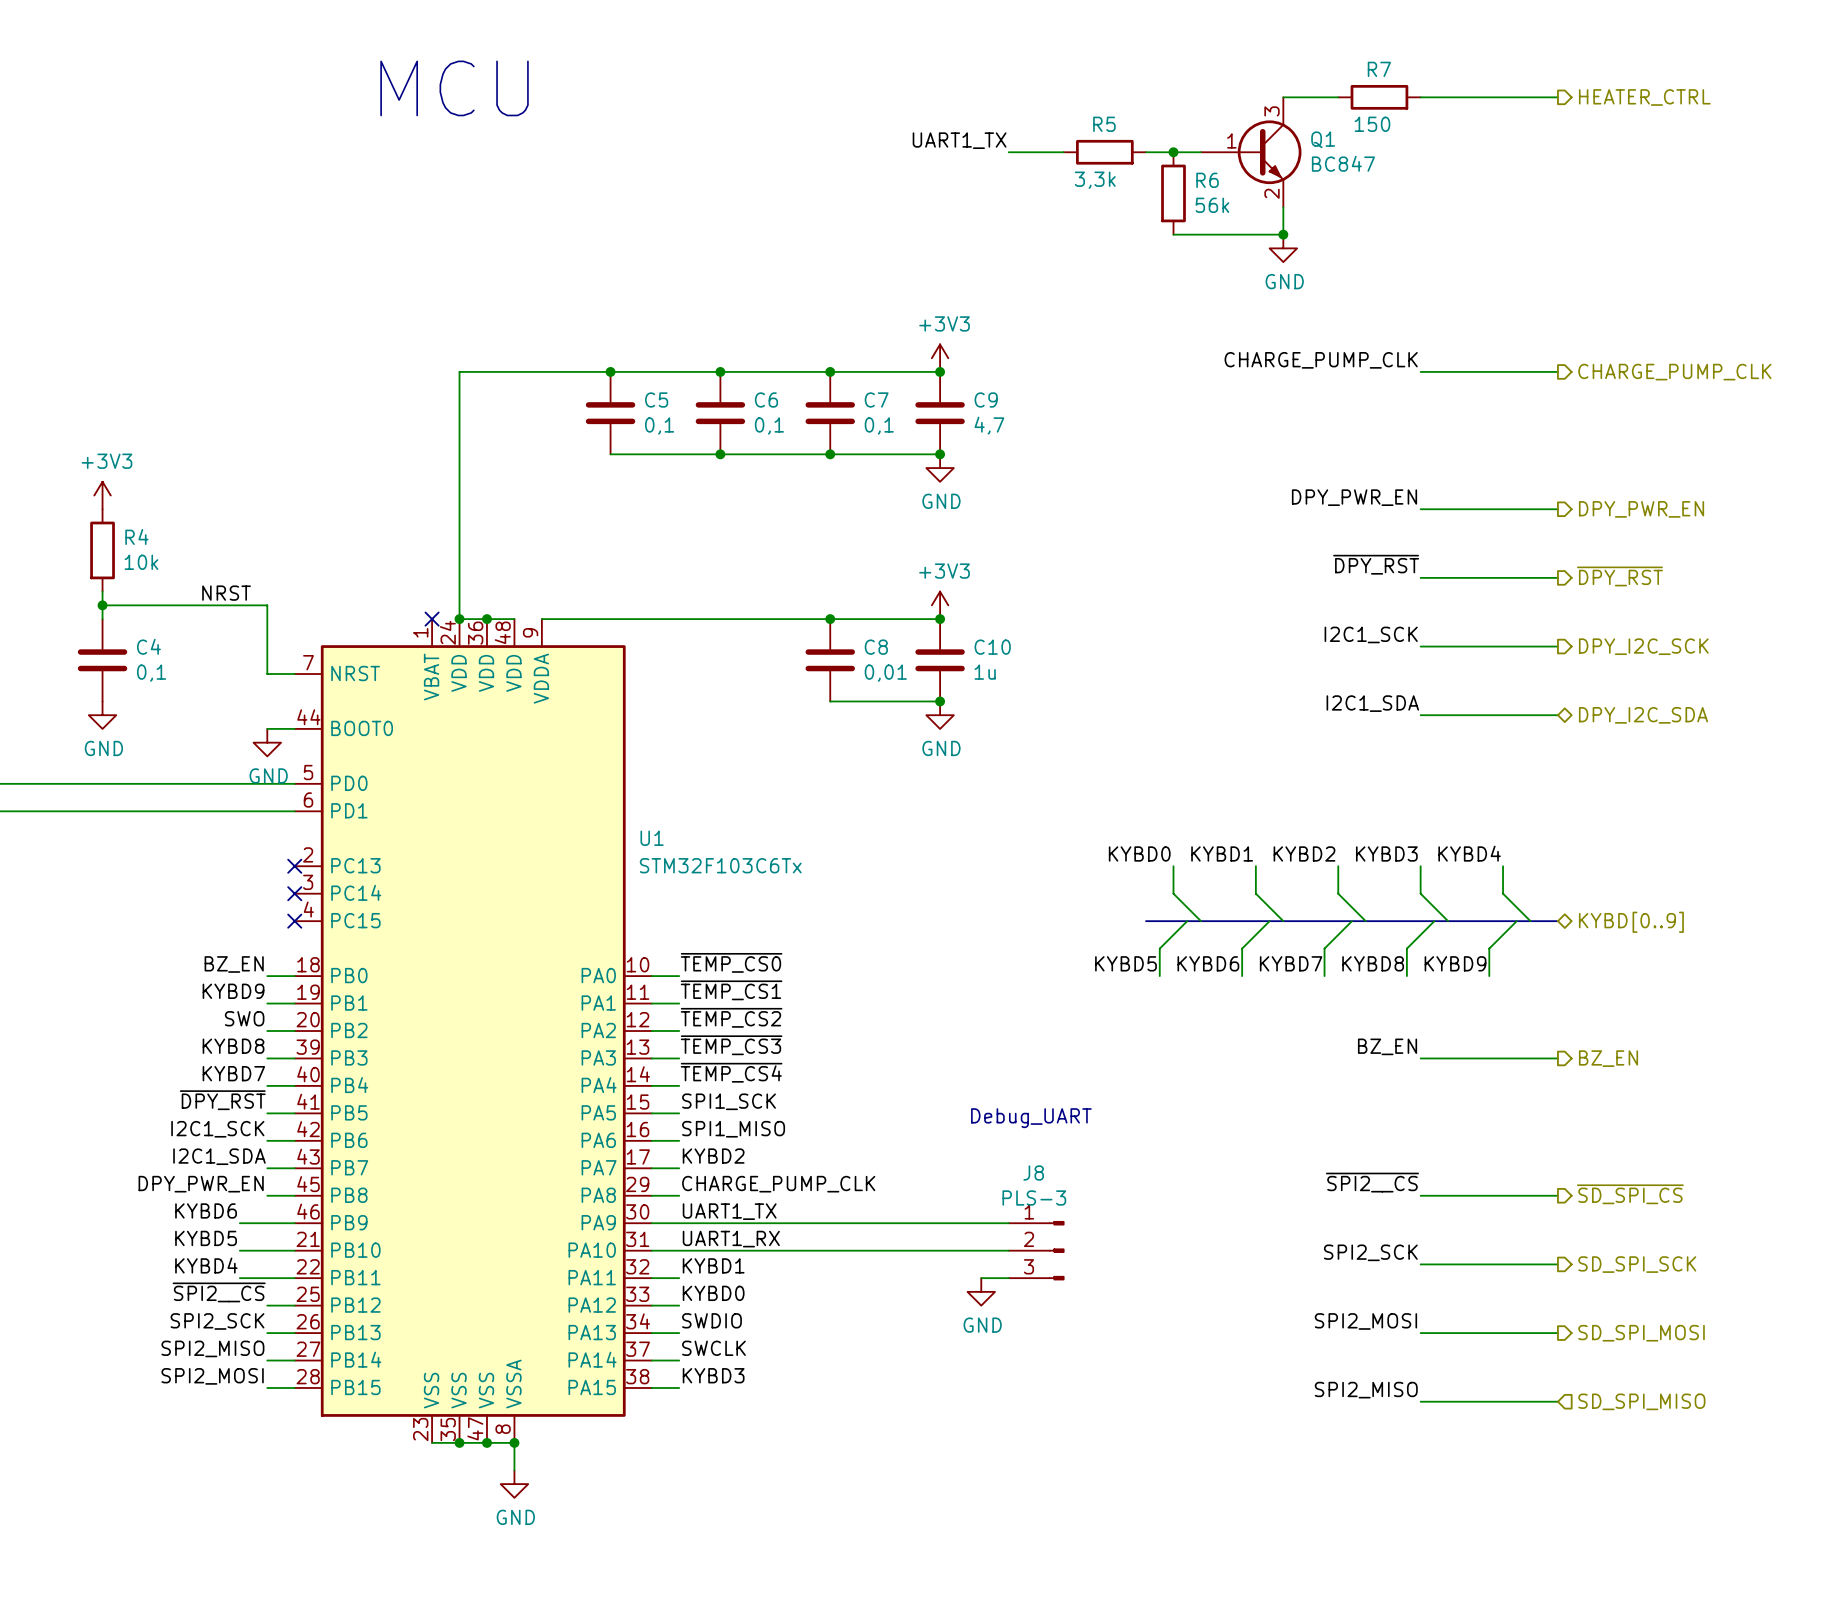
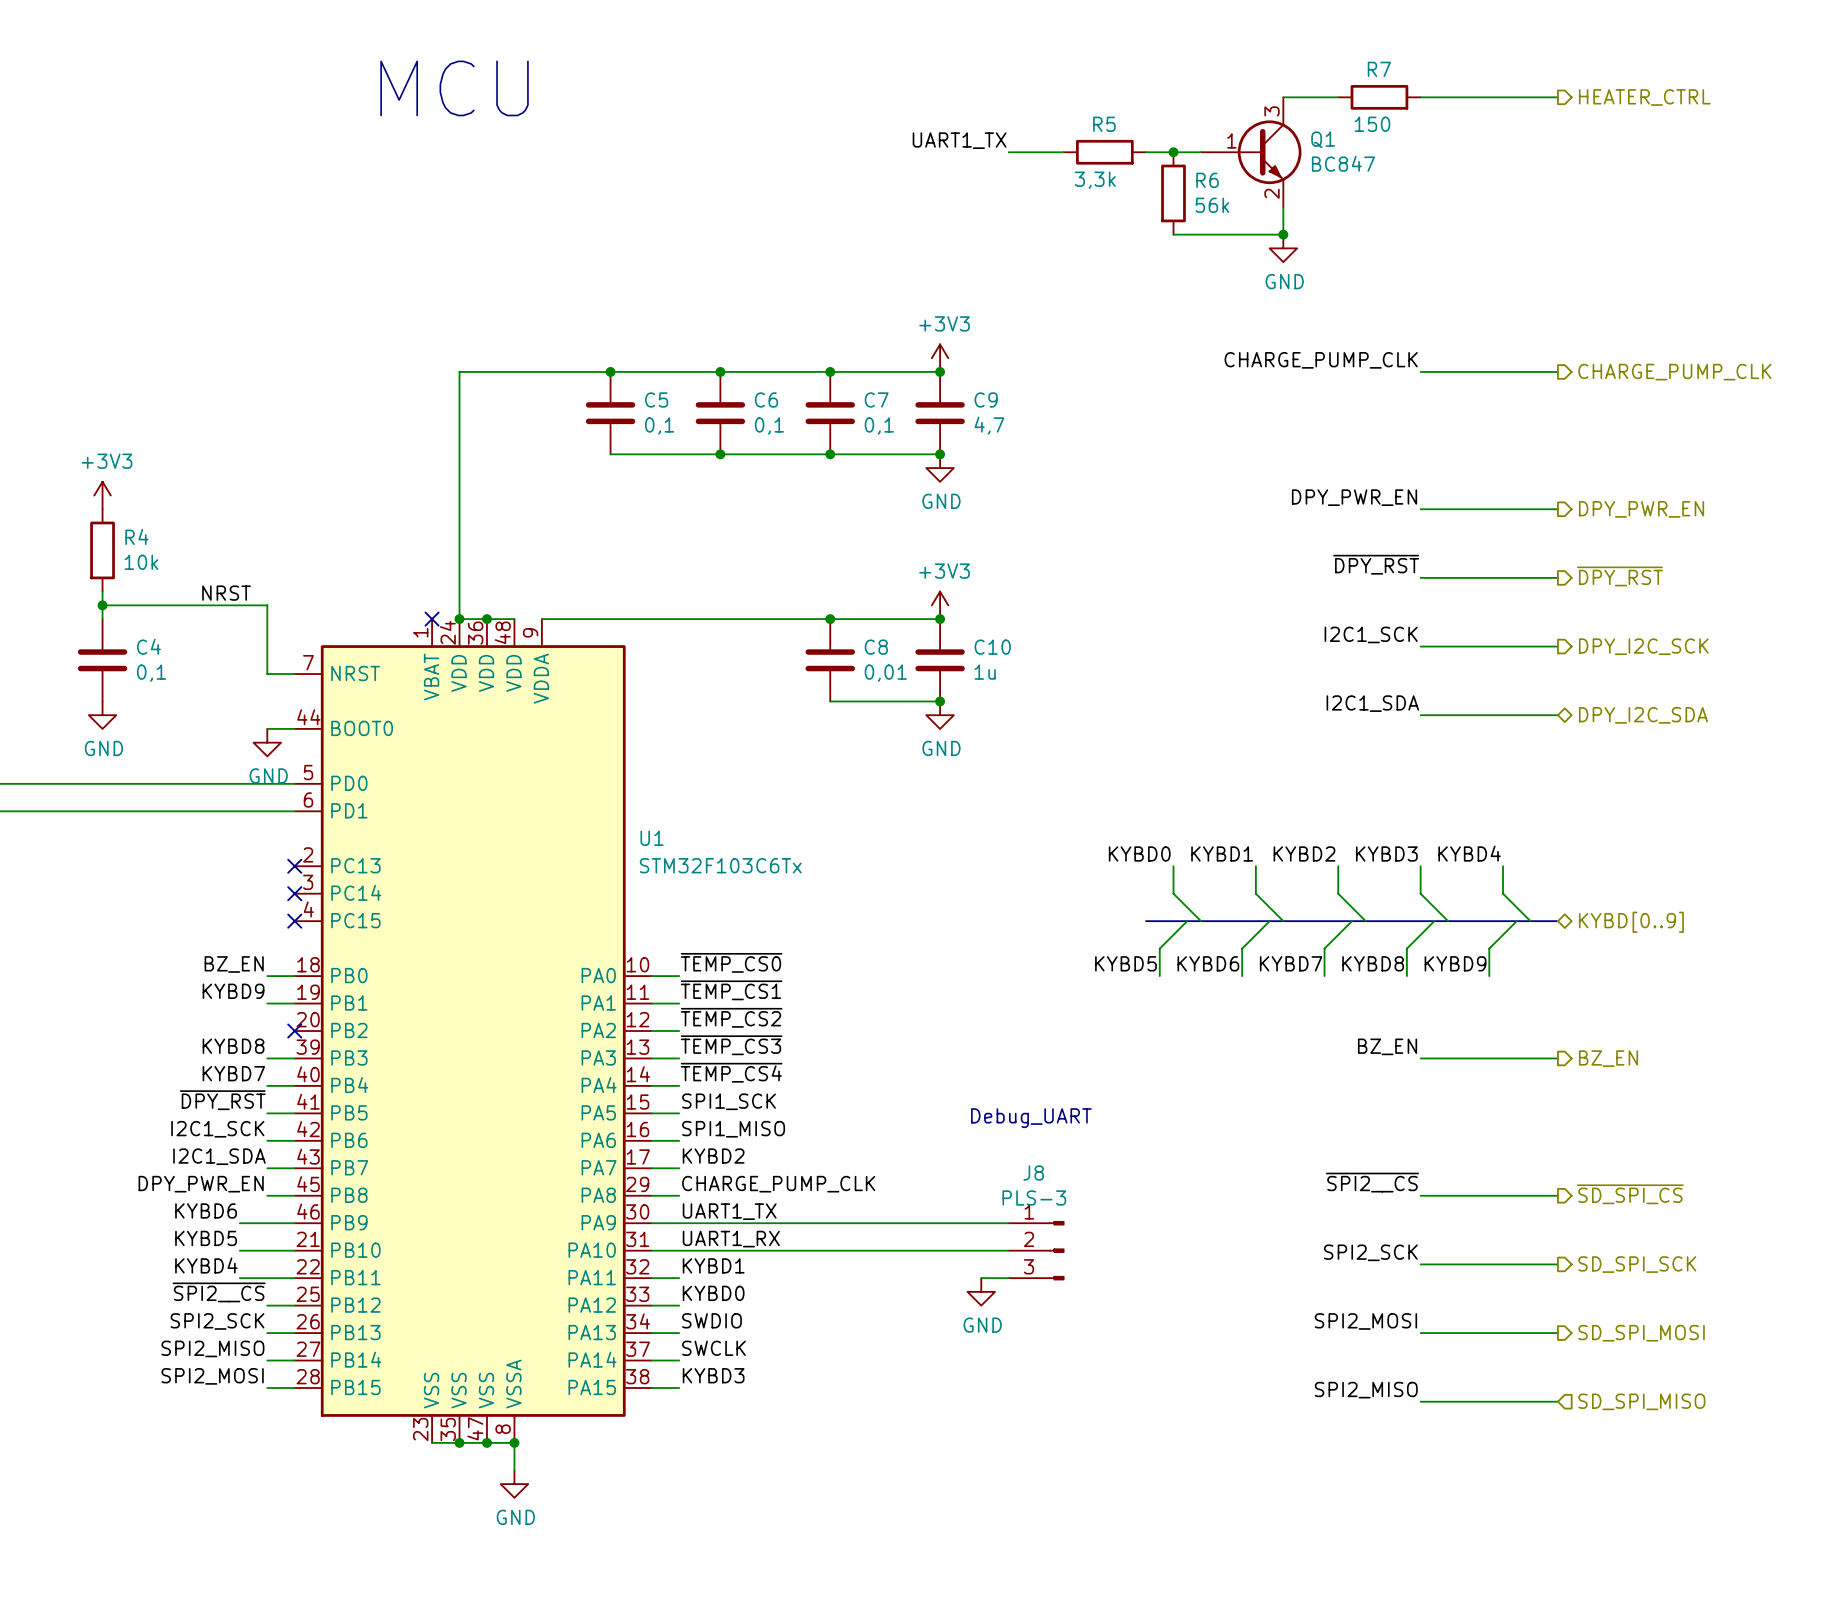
label: SWO (244, 1018) -> none
wire: (267, 1031) (294, 1031) -> none
no-connect mark: none -> (294, 1031)

